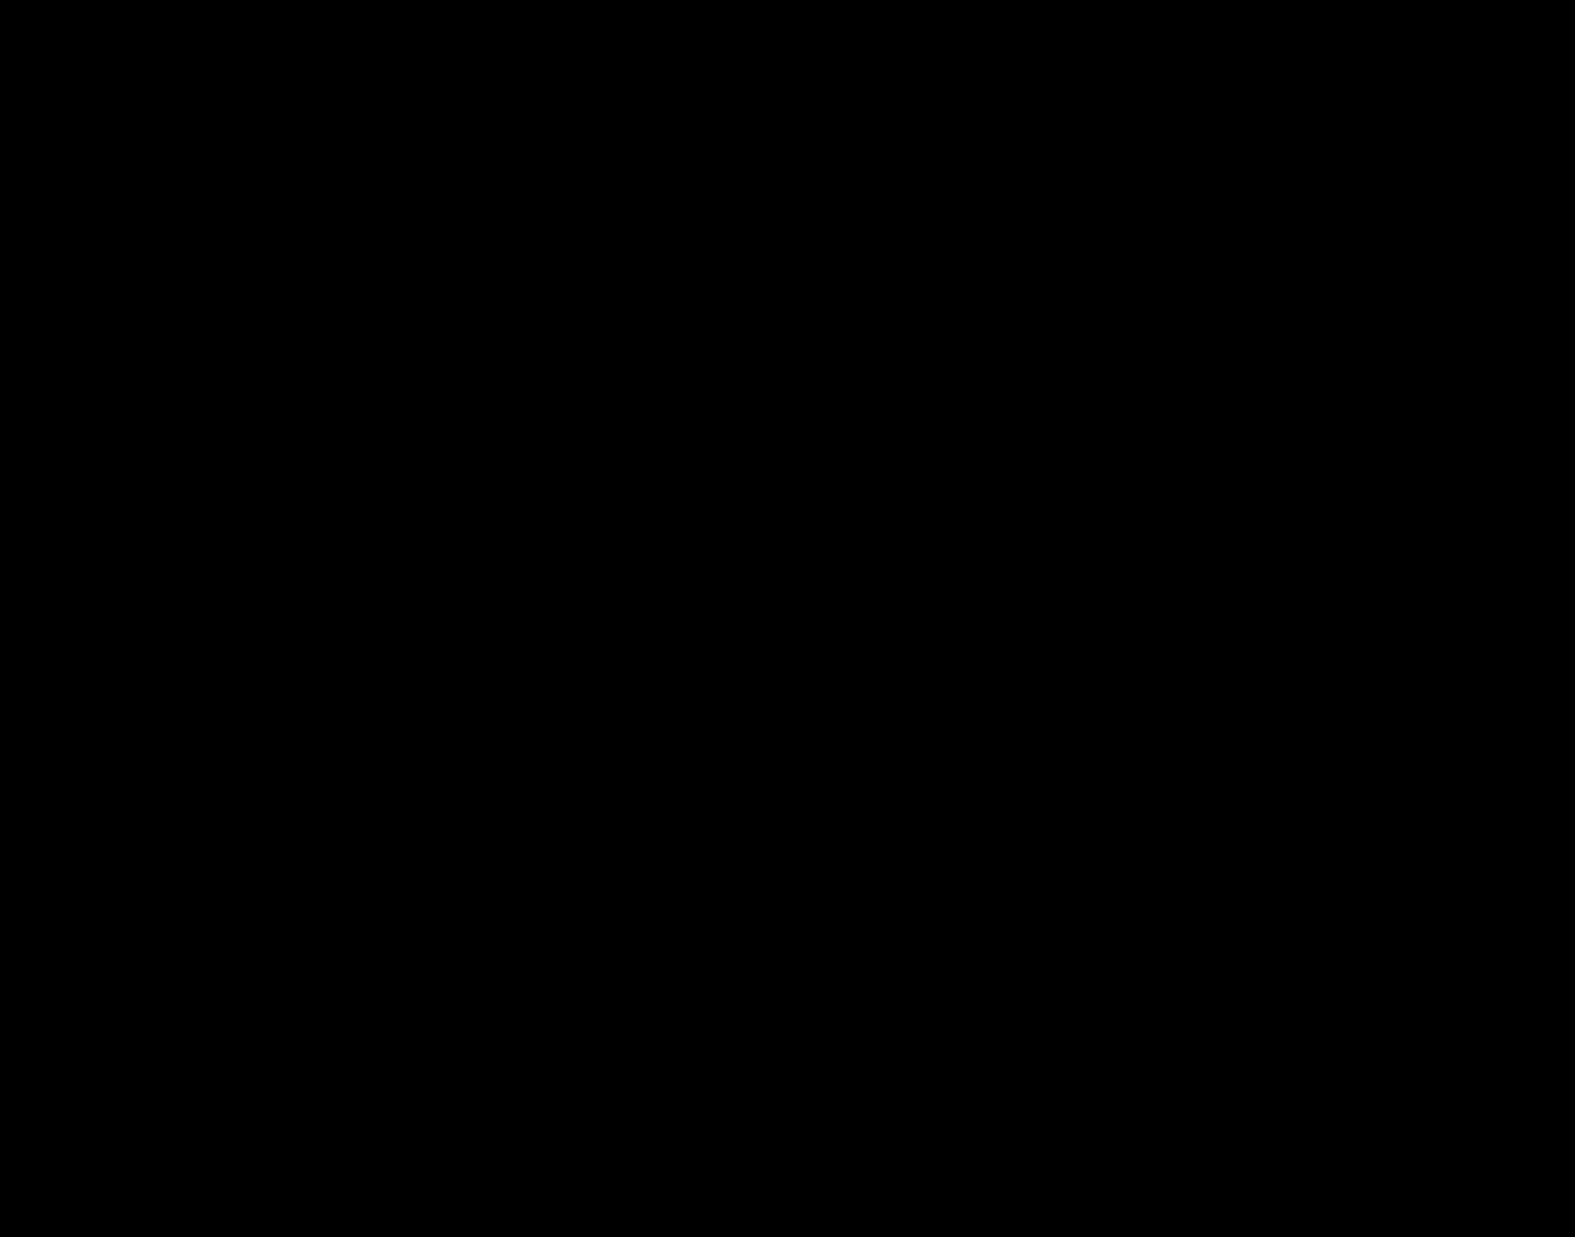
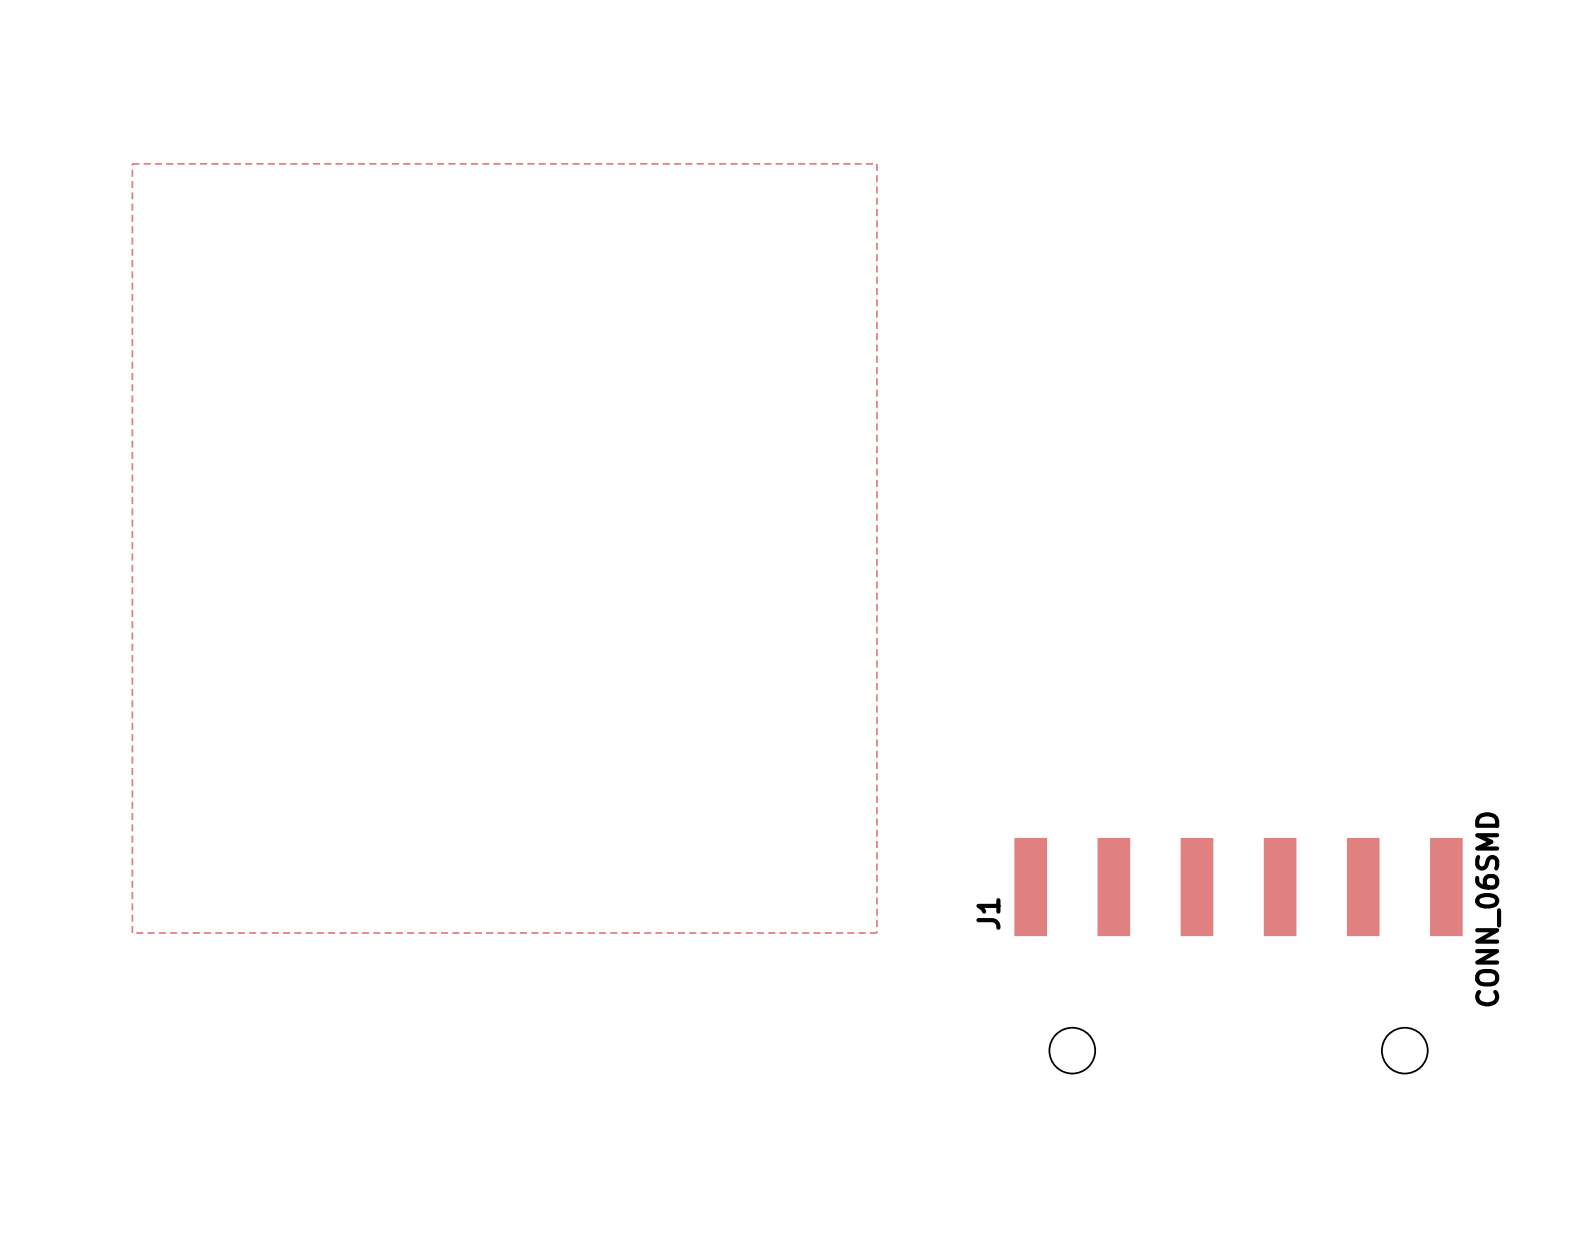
zone outline: none -> (132, 163) (132, 932) (876, 932) (876, 163) (132, 163)
J1: none -> CONN_06SMD (1238, 955)

